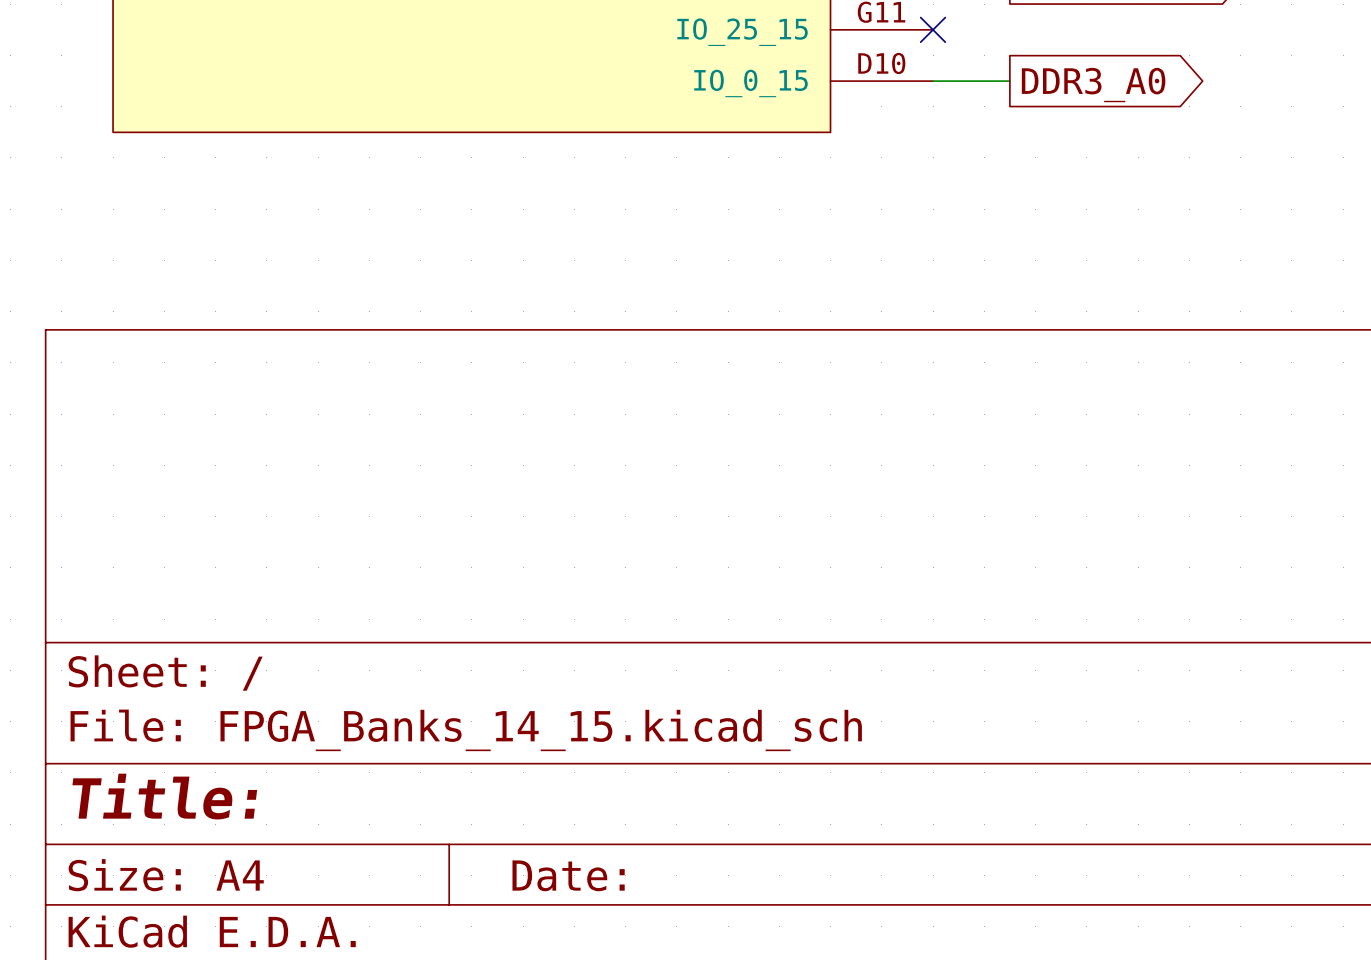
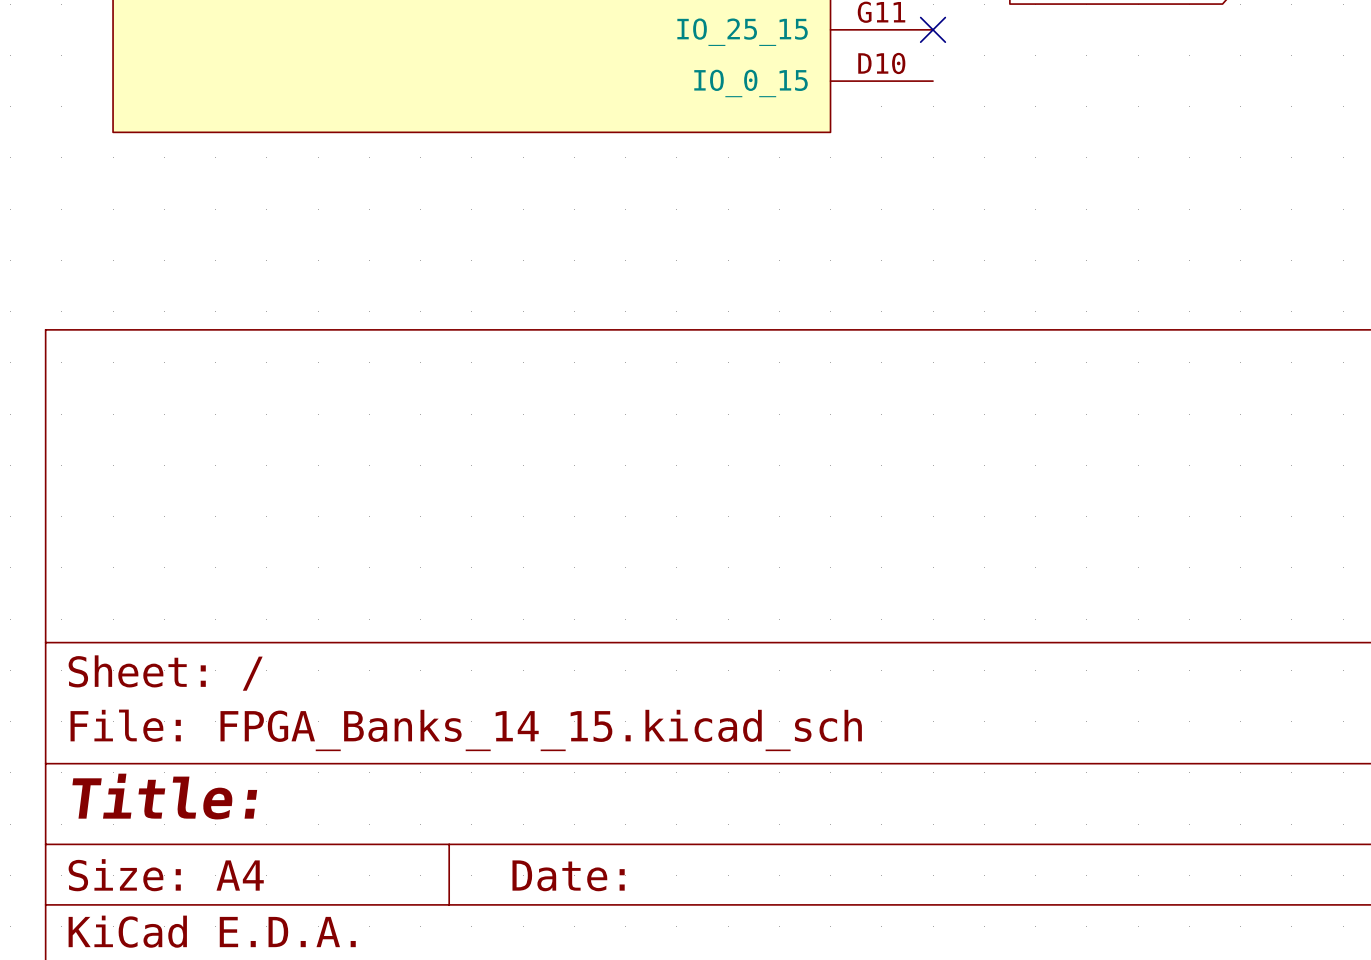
wire: (933, 81) (1009, 81) -> none
global label: DDR3_A0 (1093, 85) -> none

